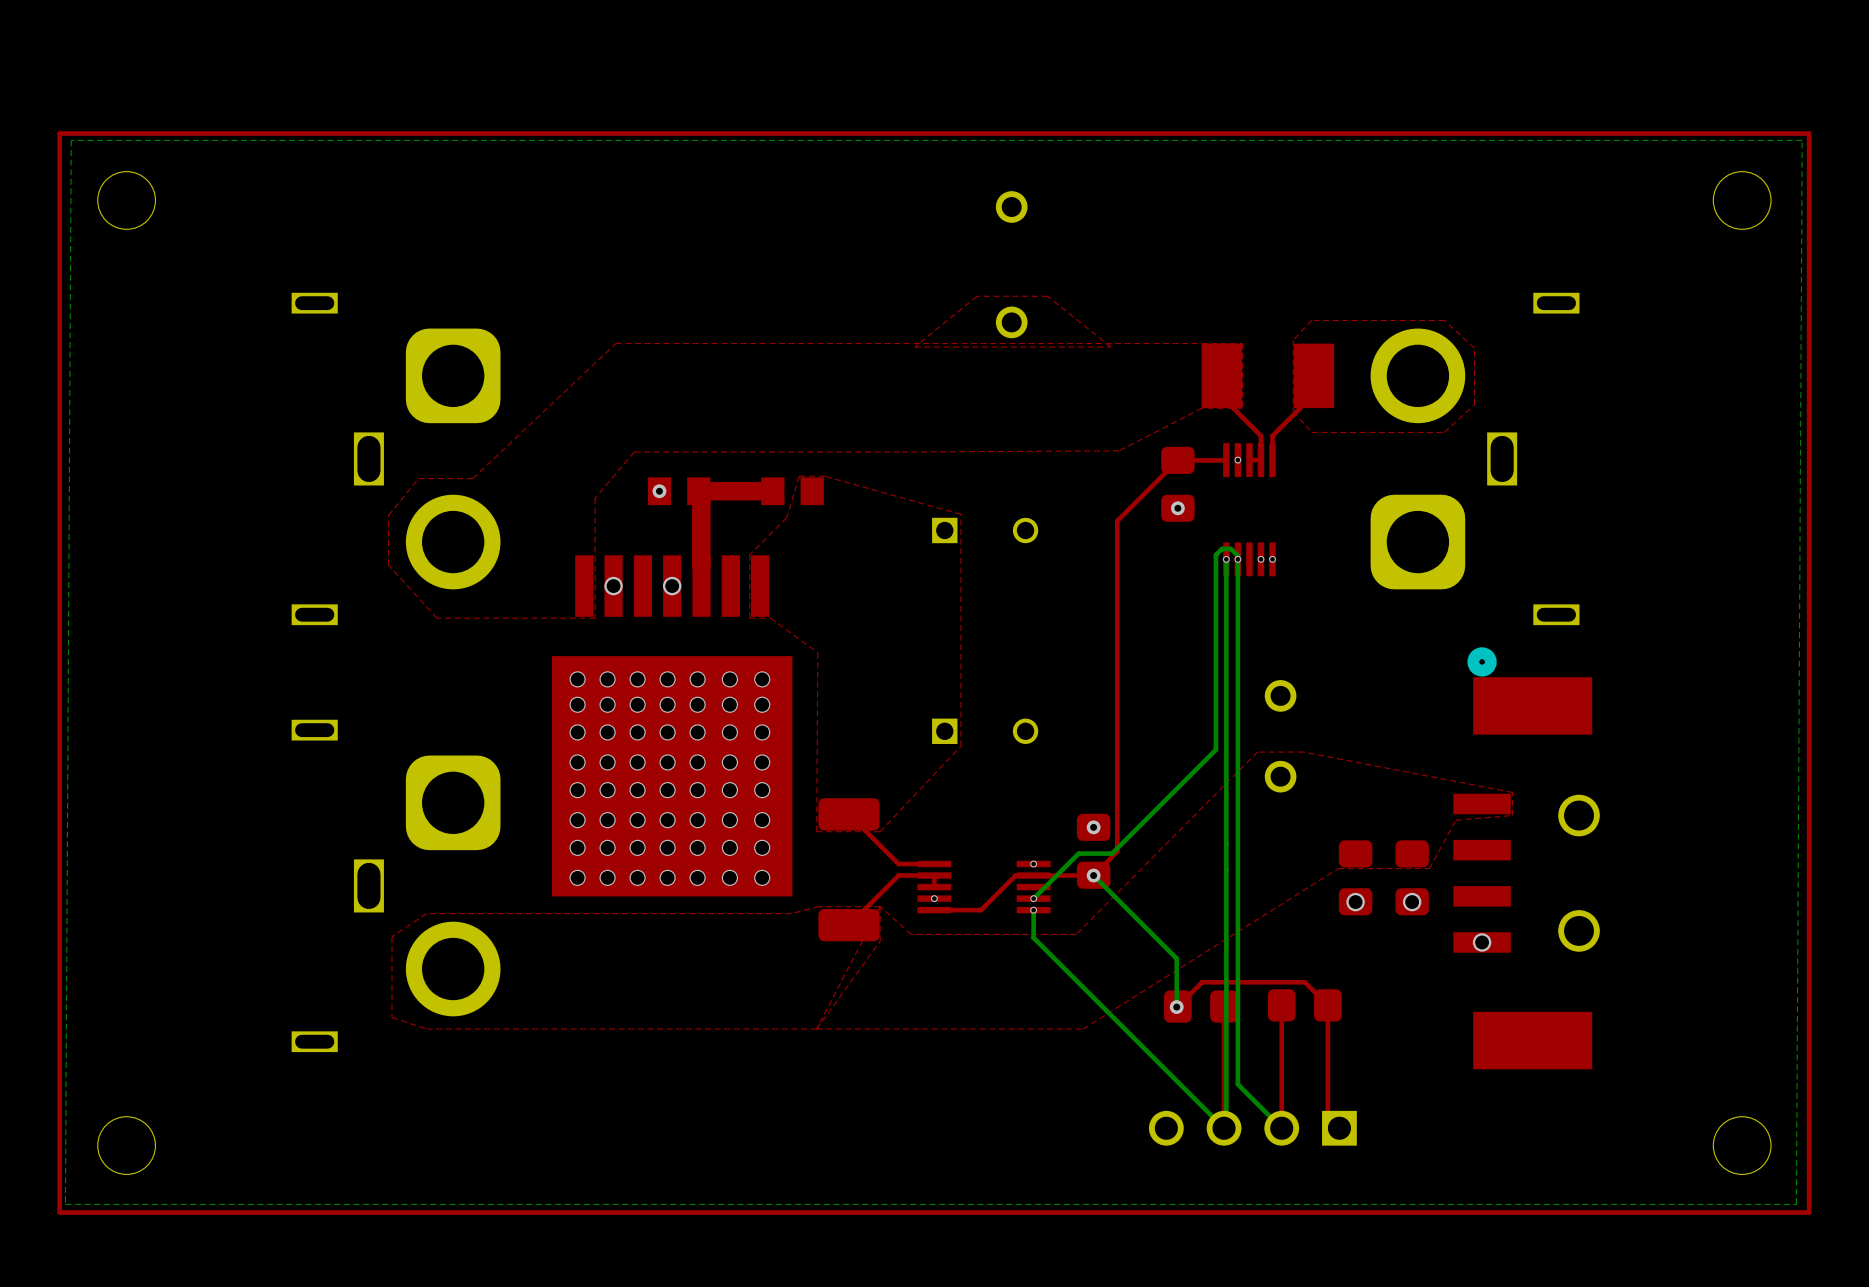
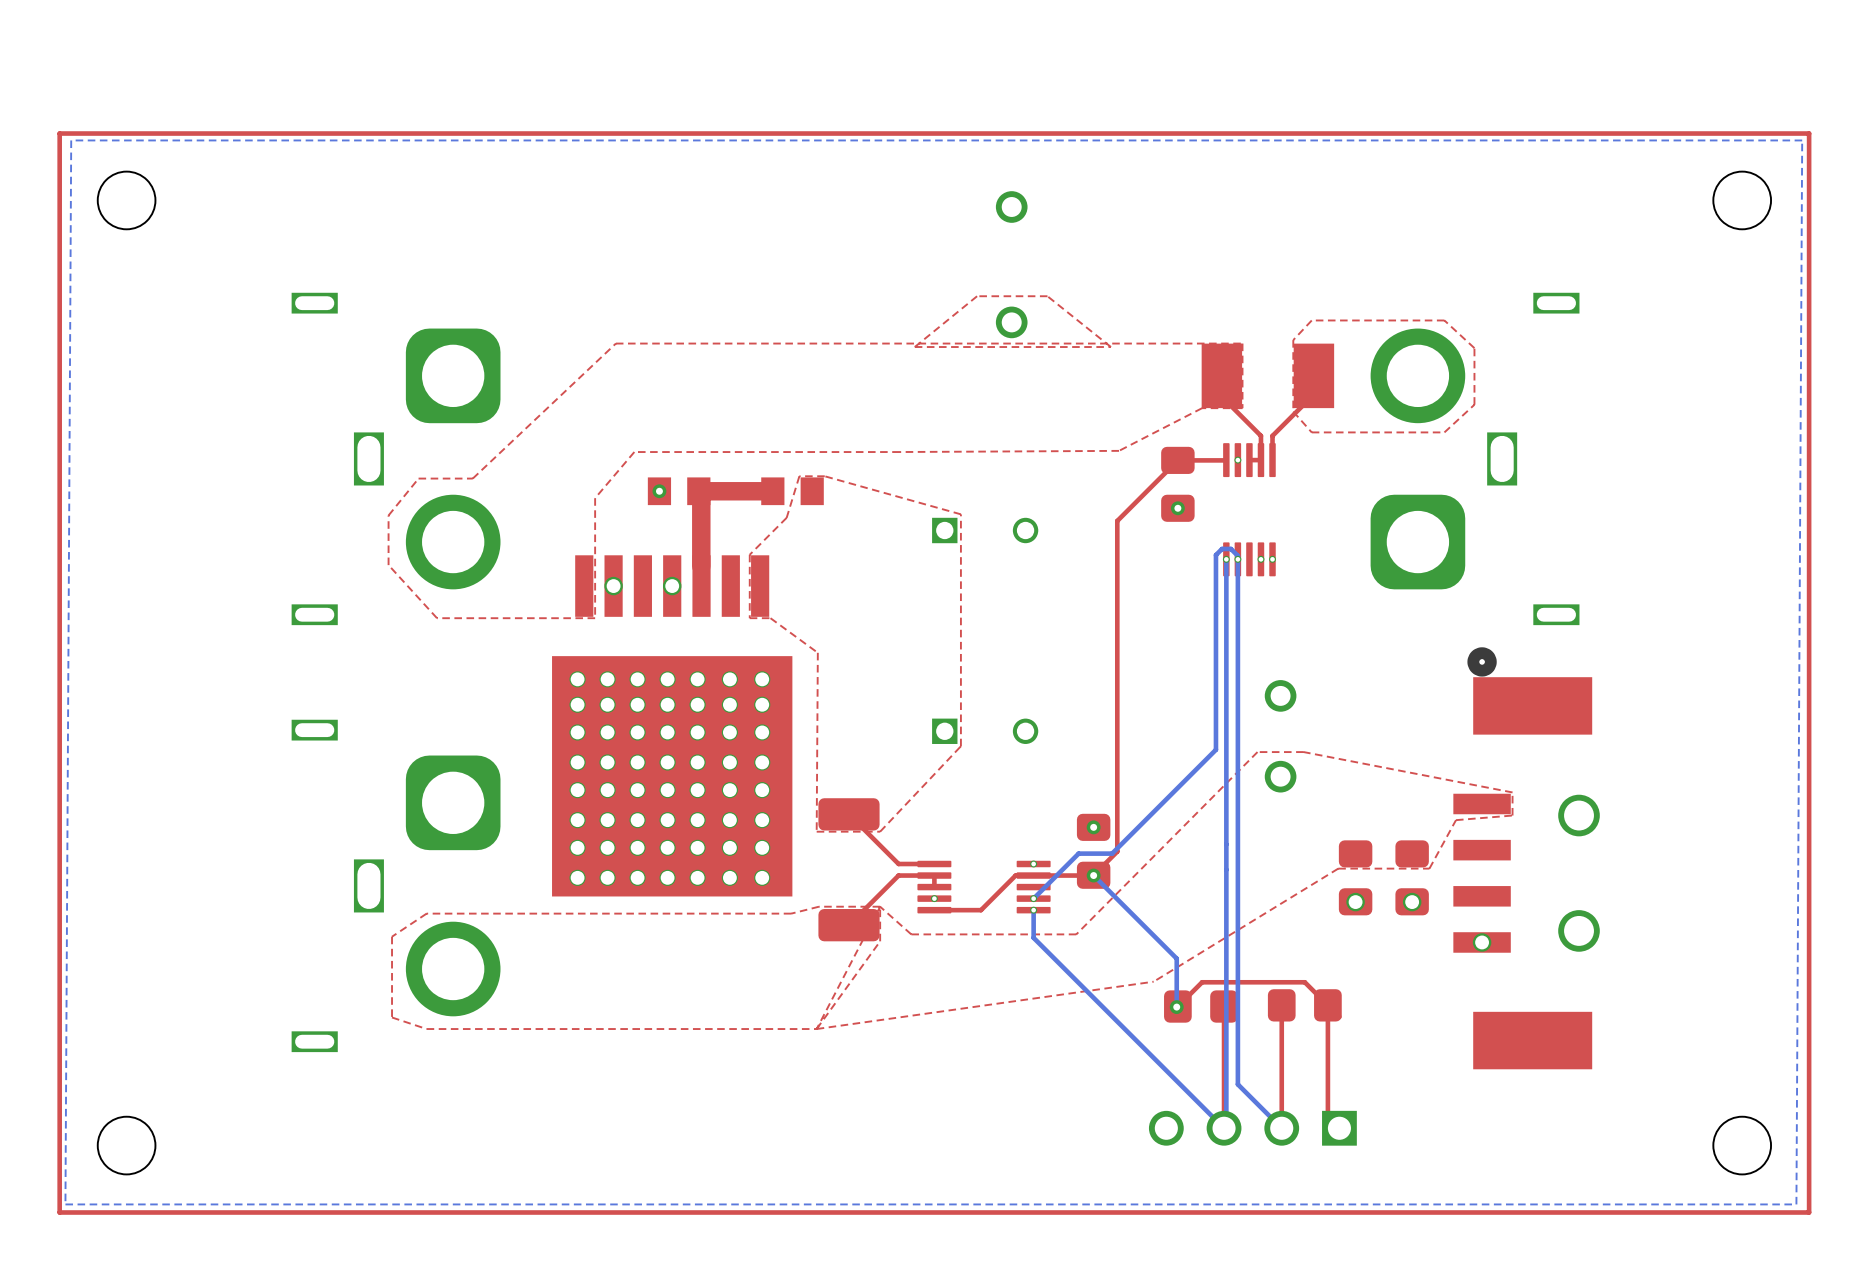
top zone outline: (1338, 868) (1083, 1029) (816, 1029) -> (1338, 868) (1153, 981) (816, 1029)

